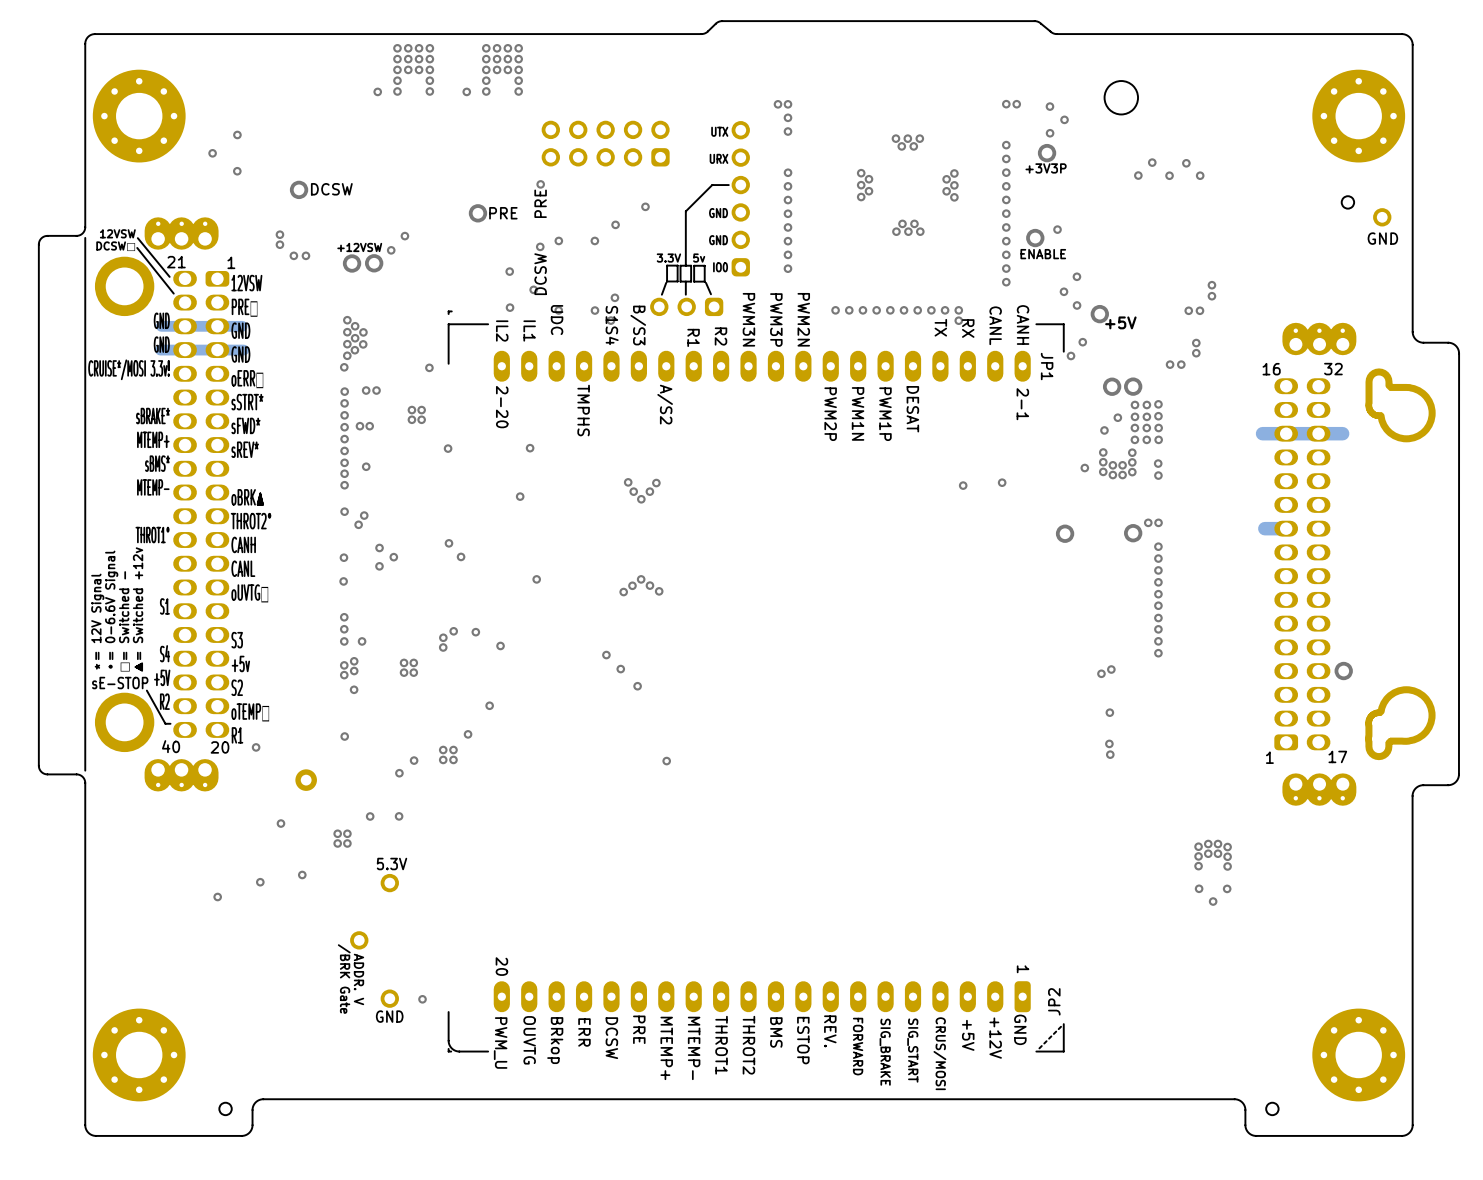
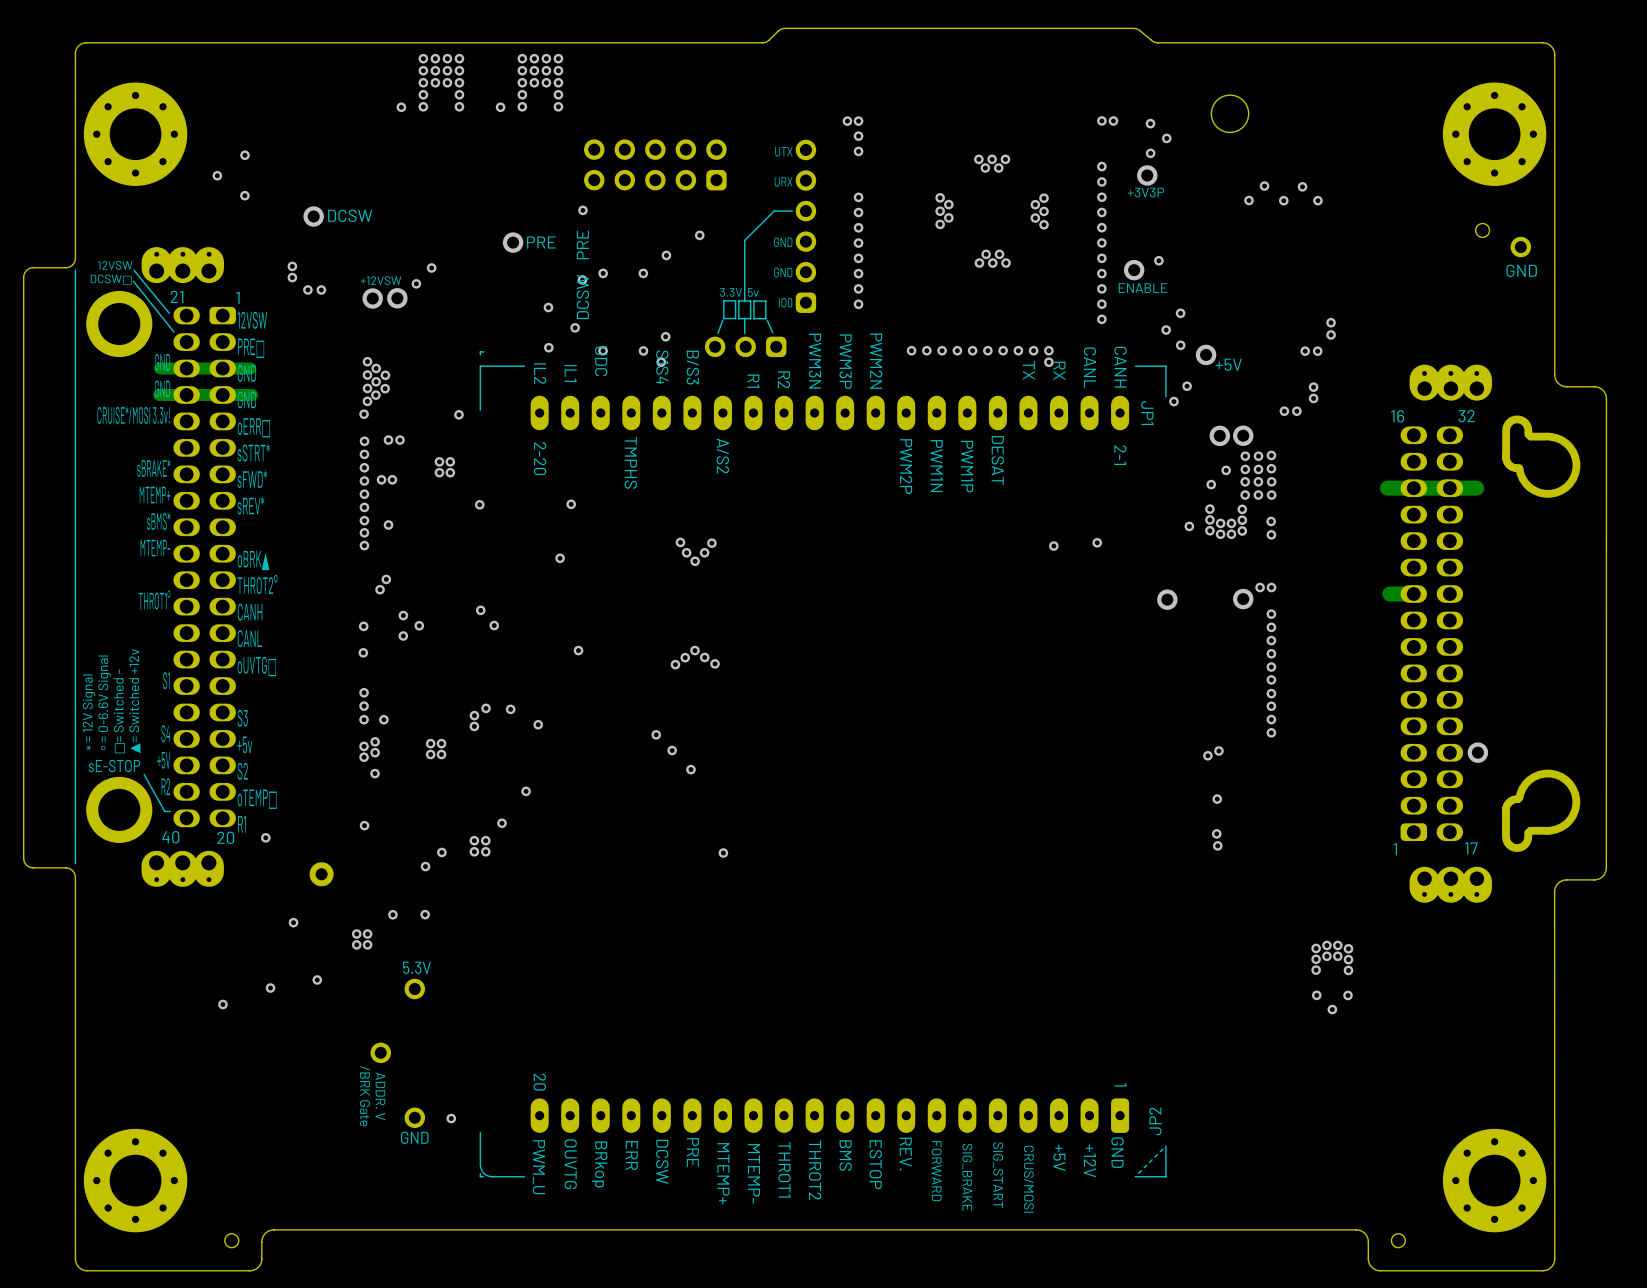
via: (344, 511) -> none

